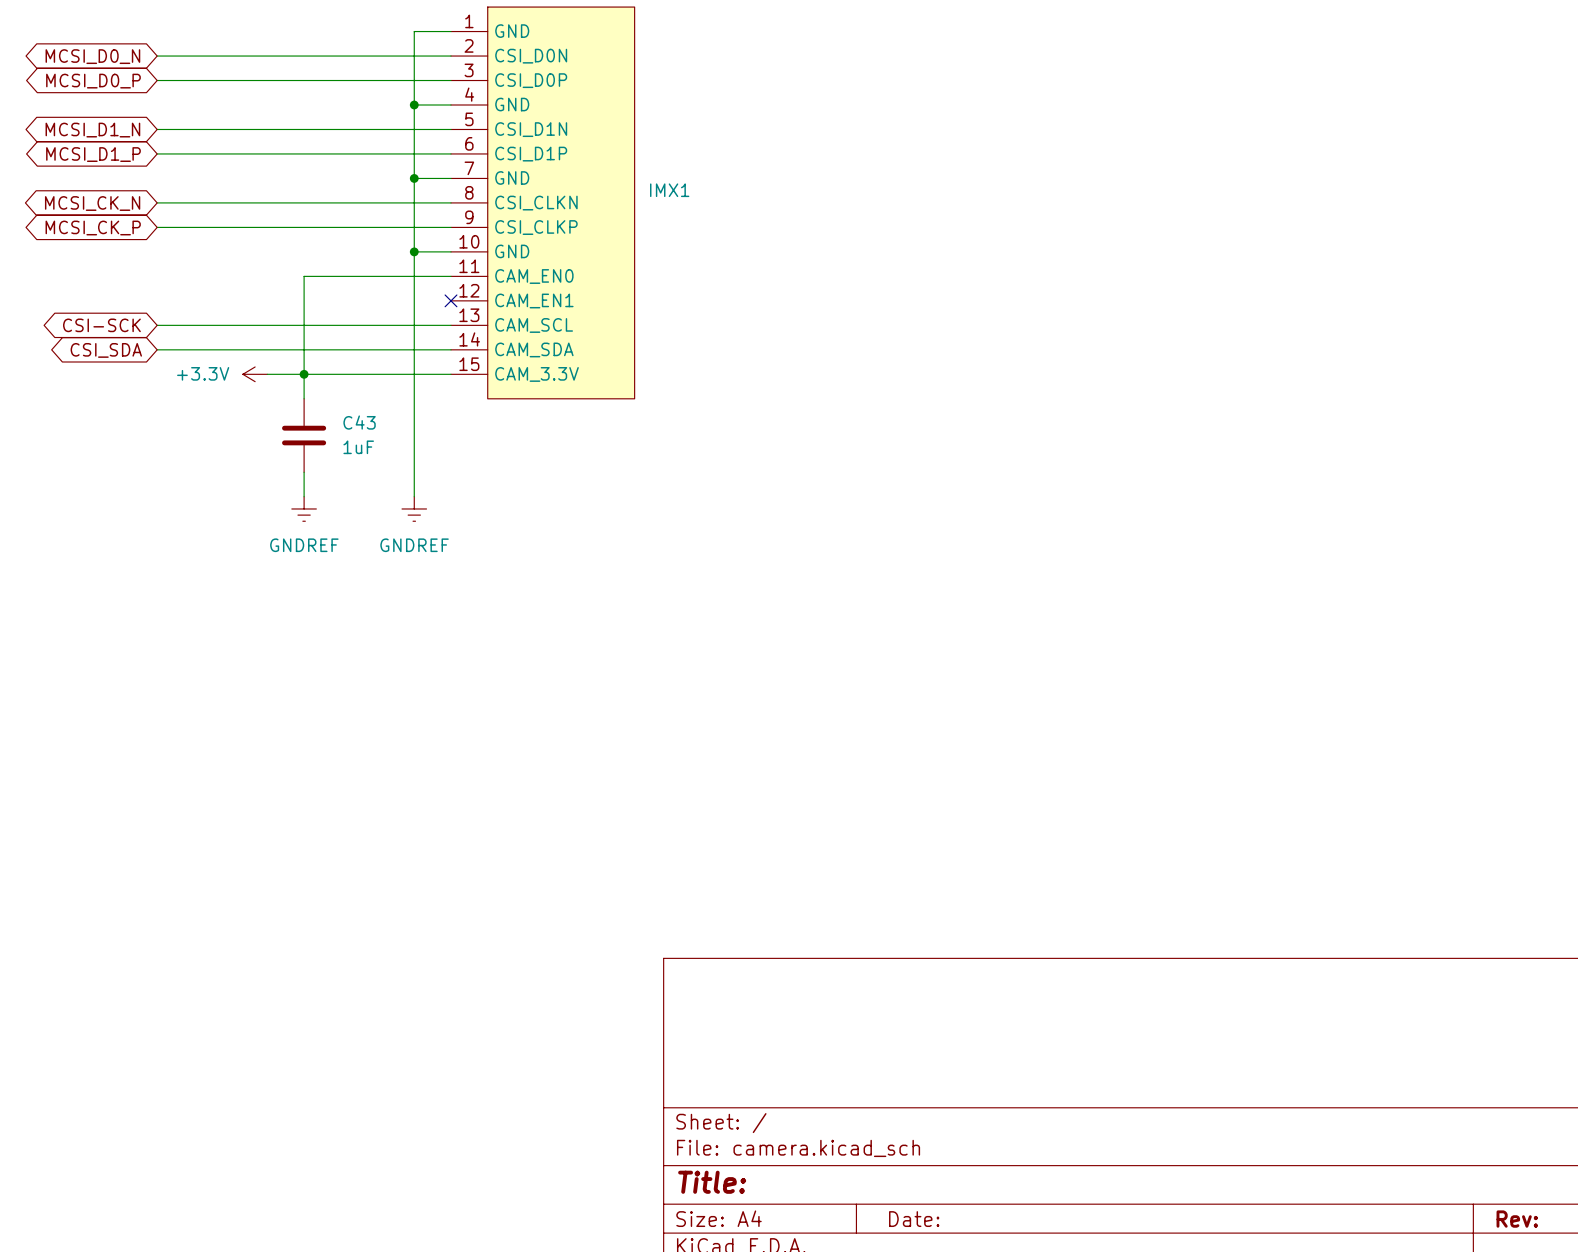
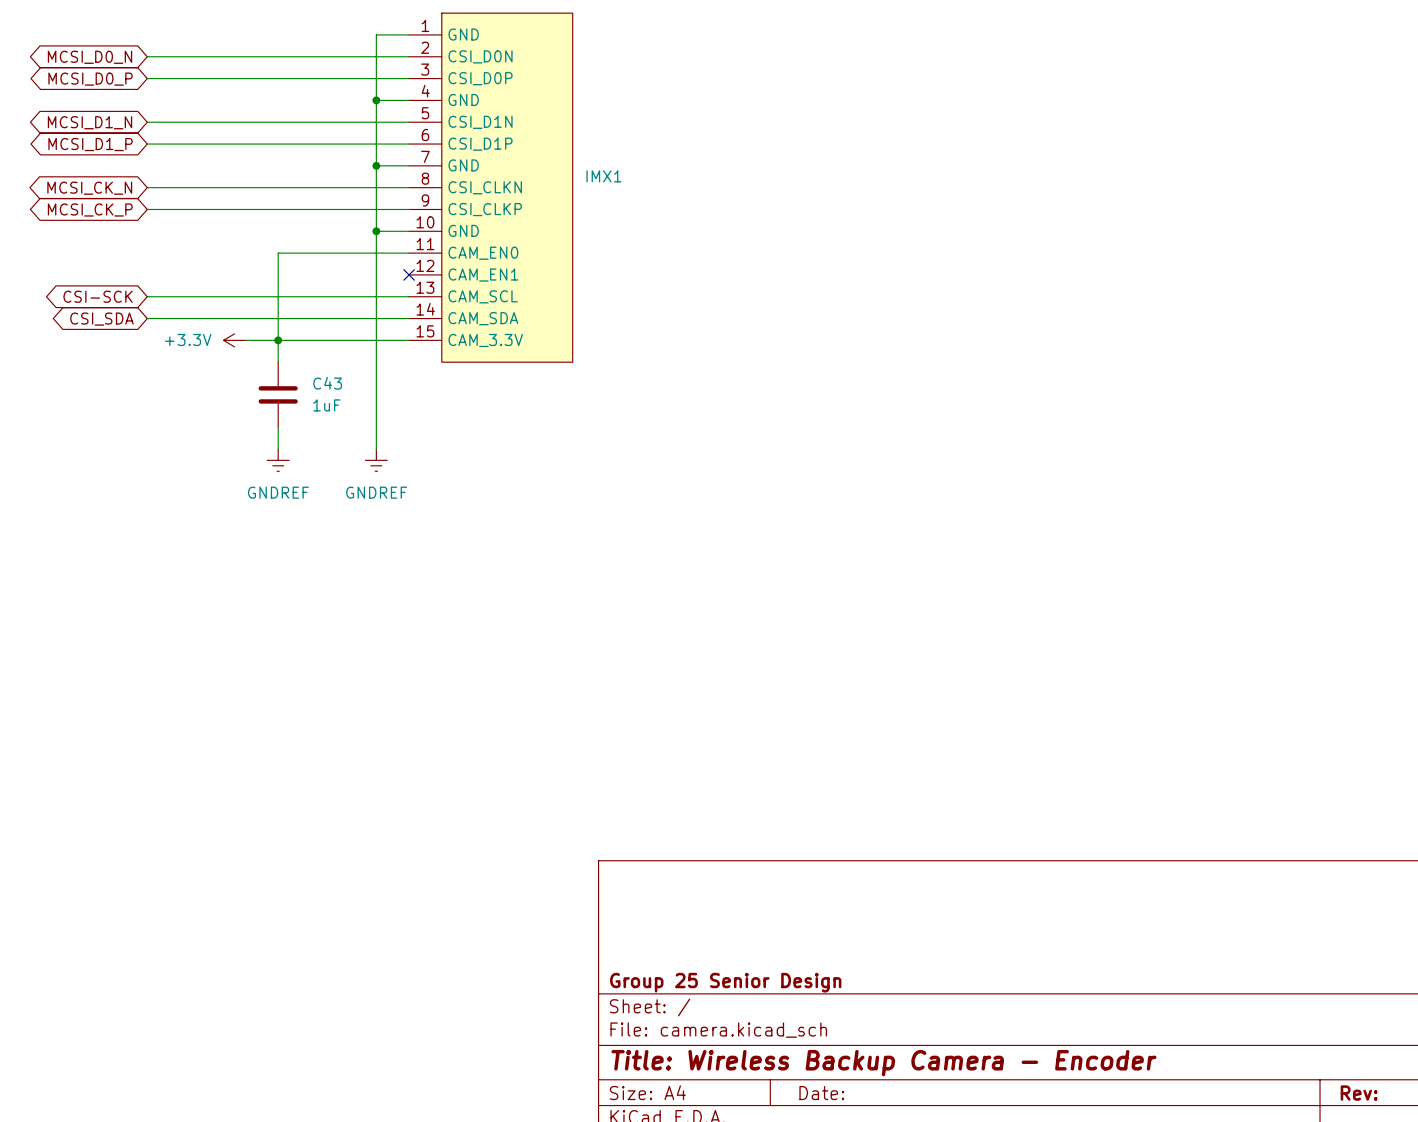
title block: none -> Group 25 Senior Design (725, 982)
title block: Title: (712, 1182) -> Title: Wireless Backup Camera - Encoder (883, 1063)

